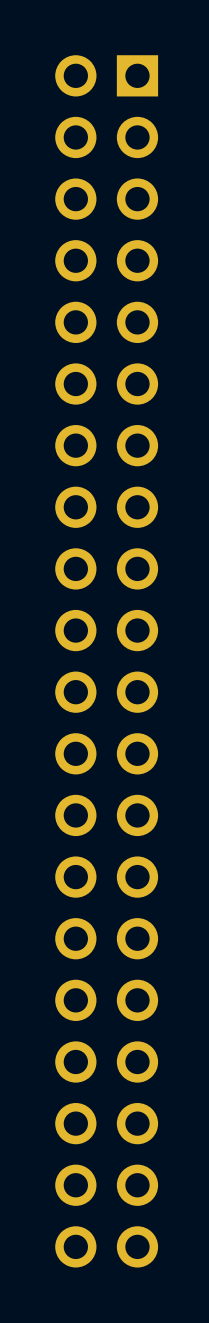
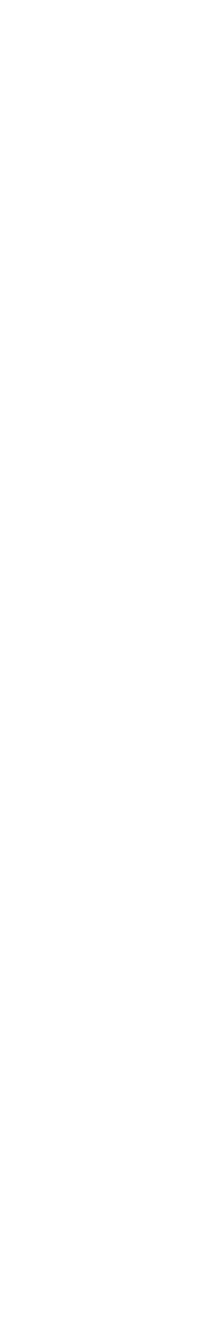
part: (106, 661) -> none

